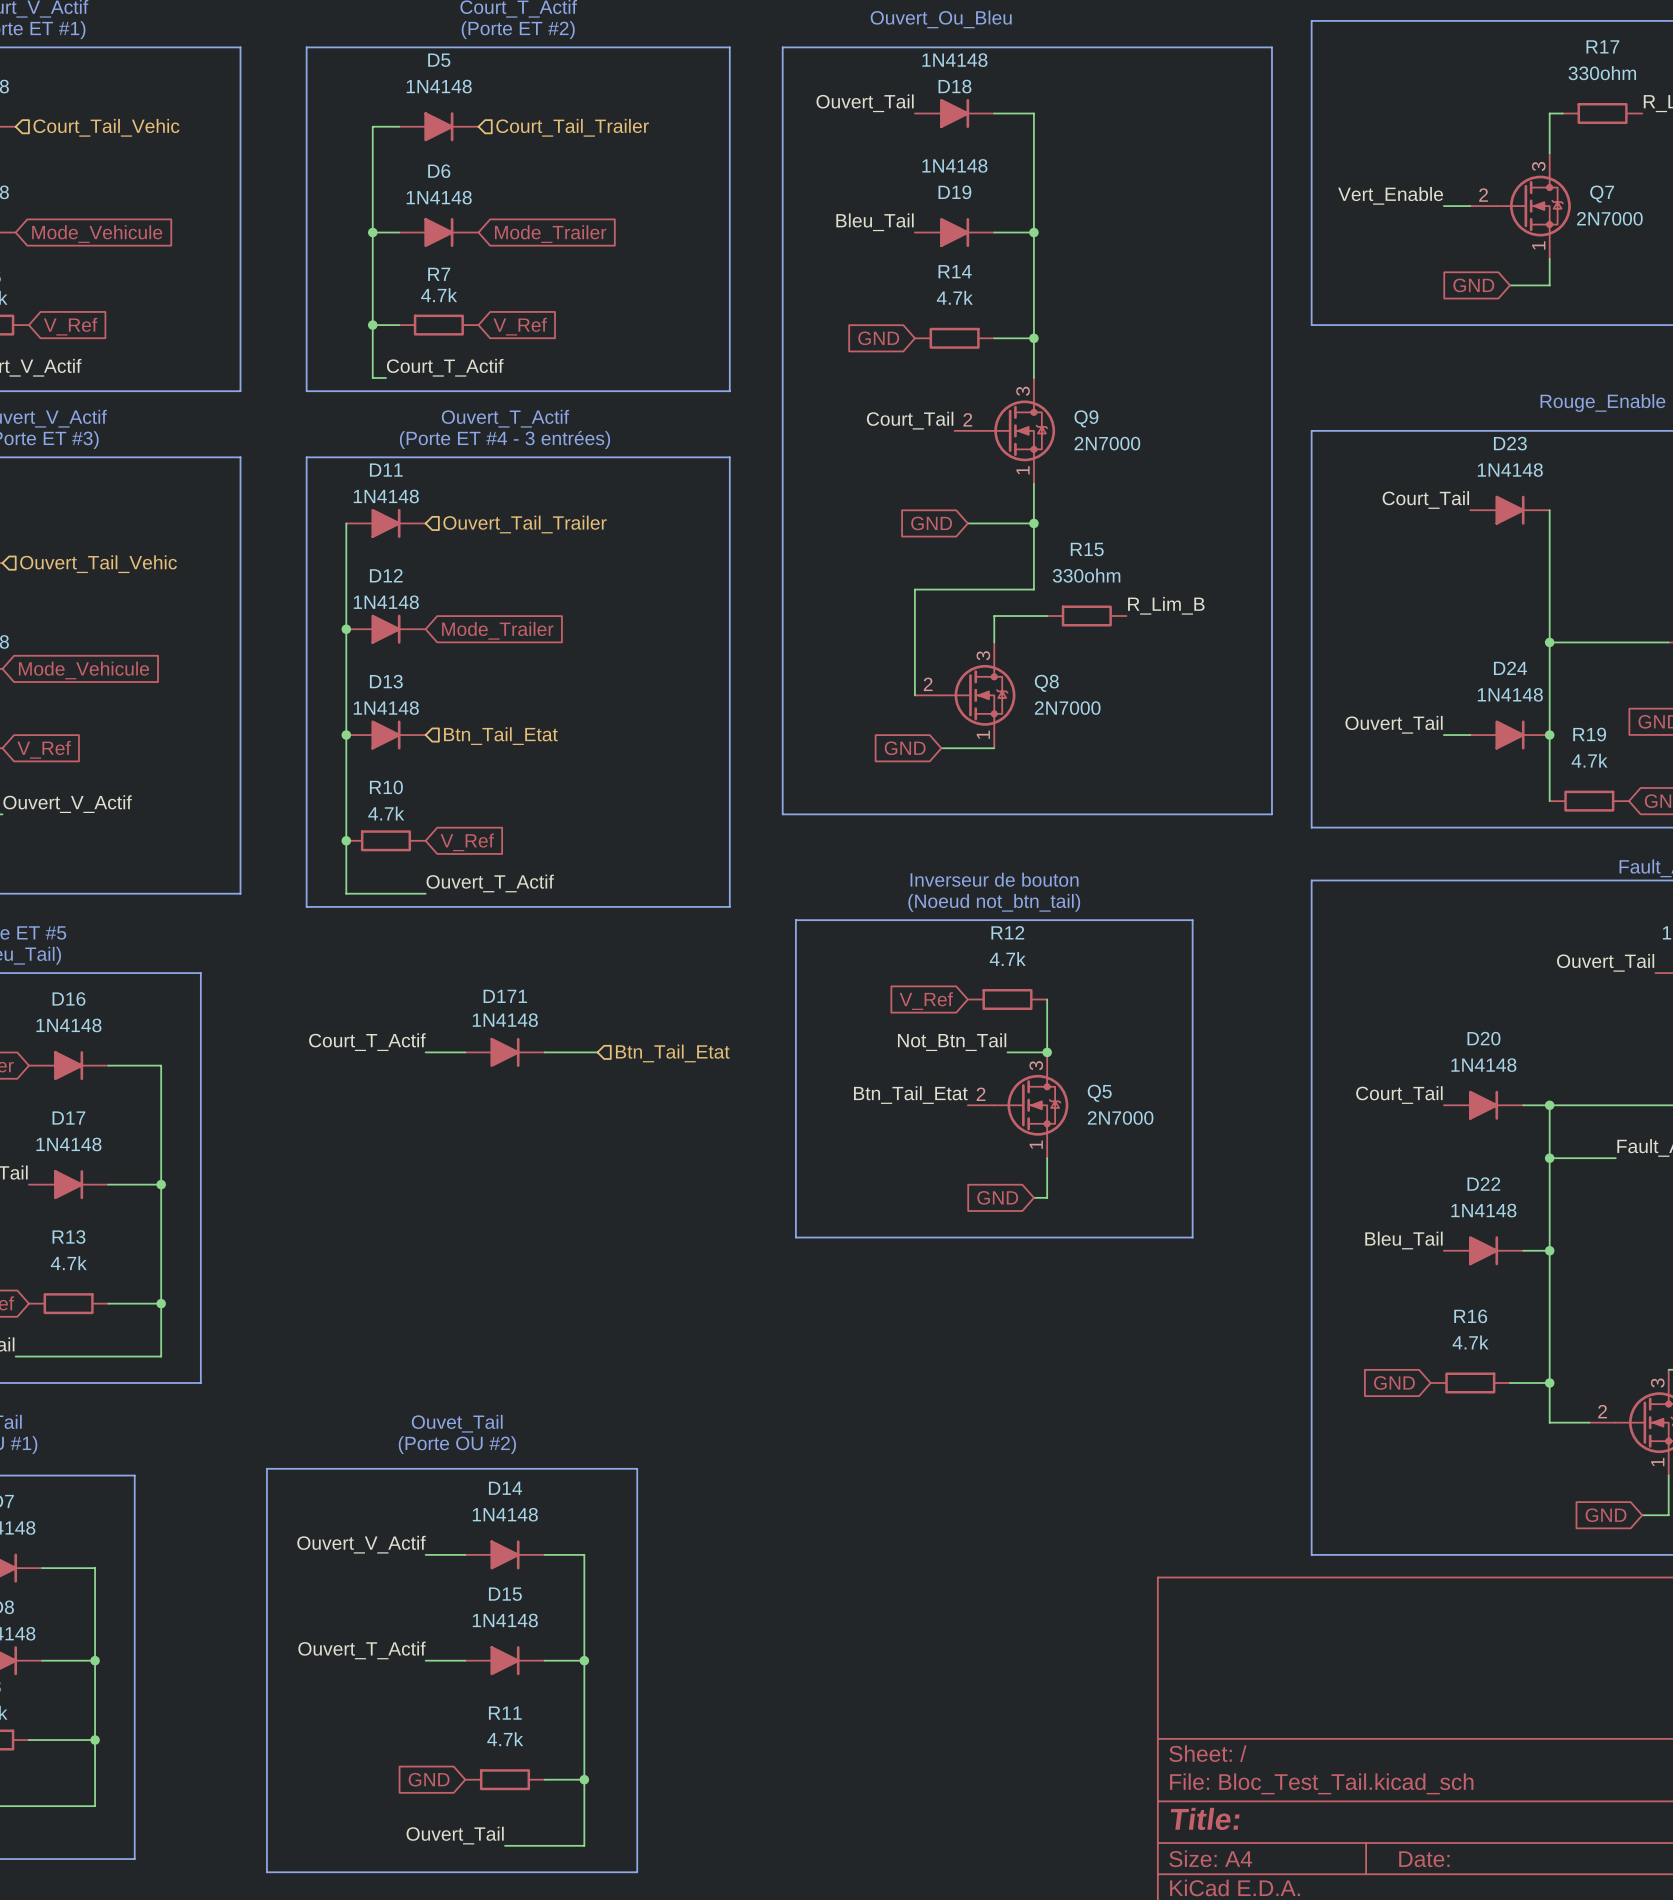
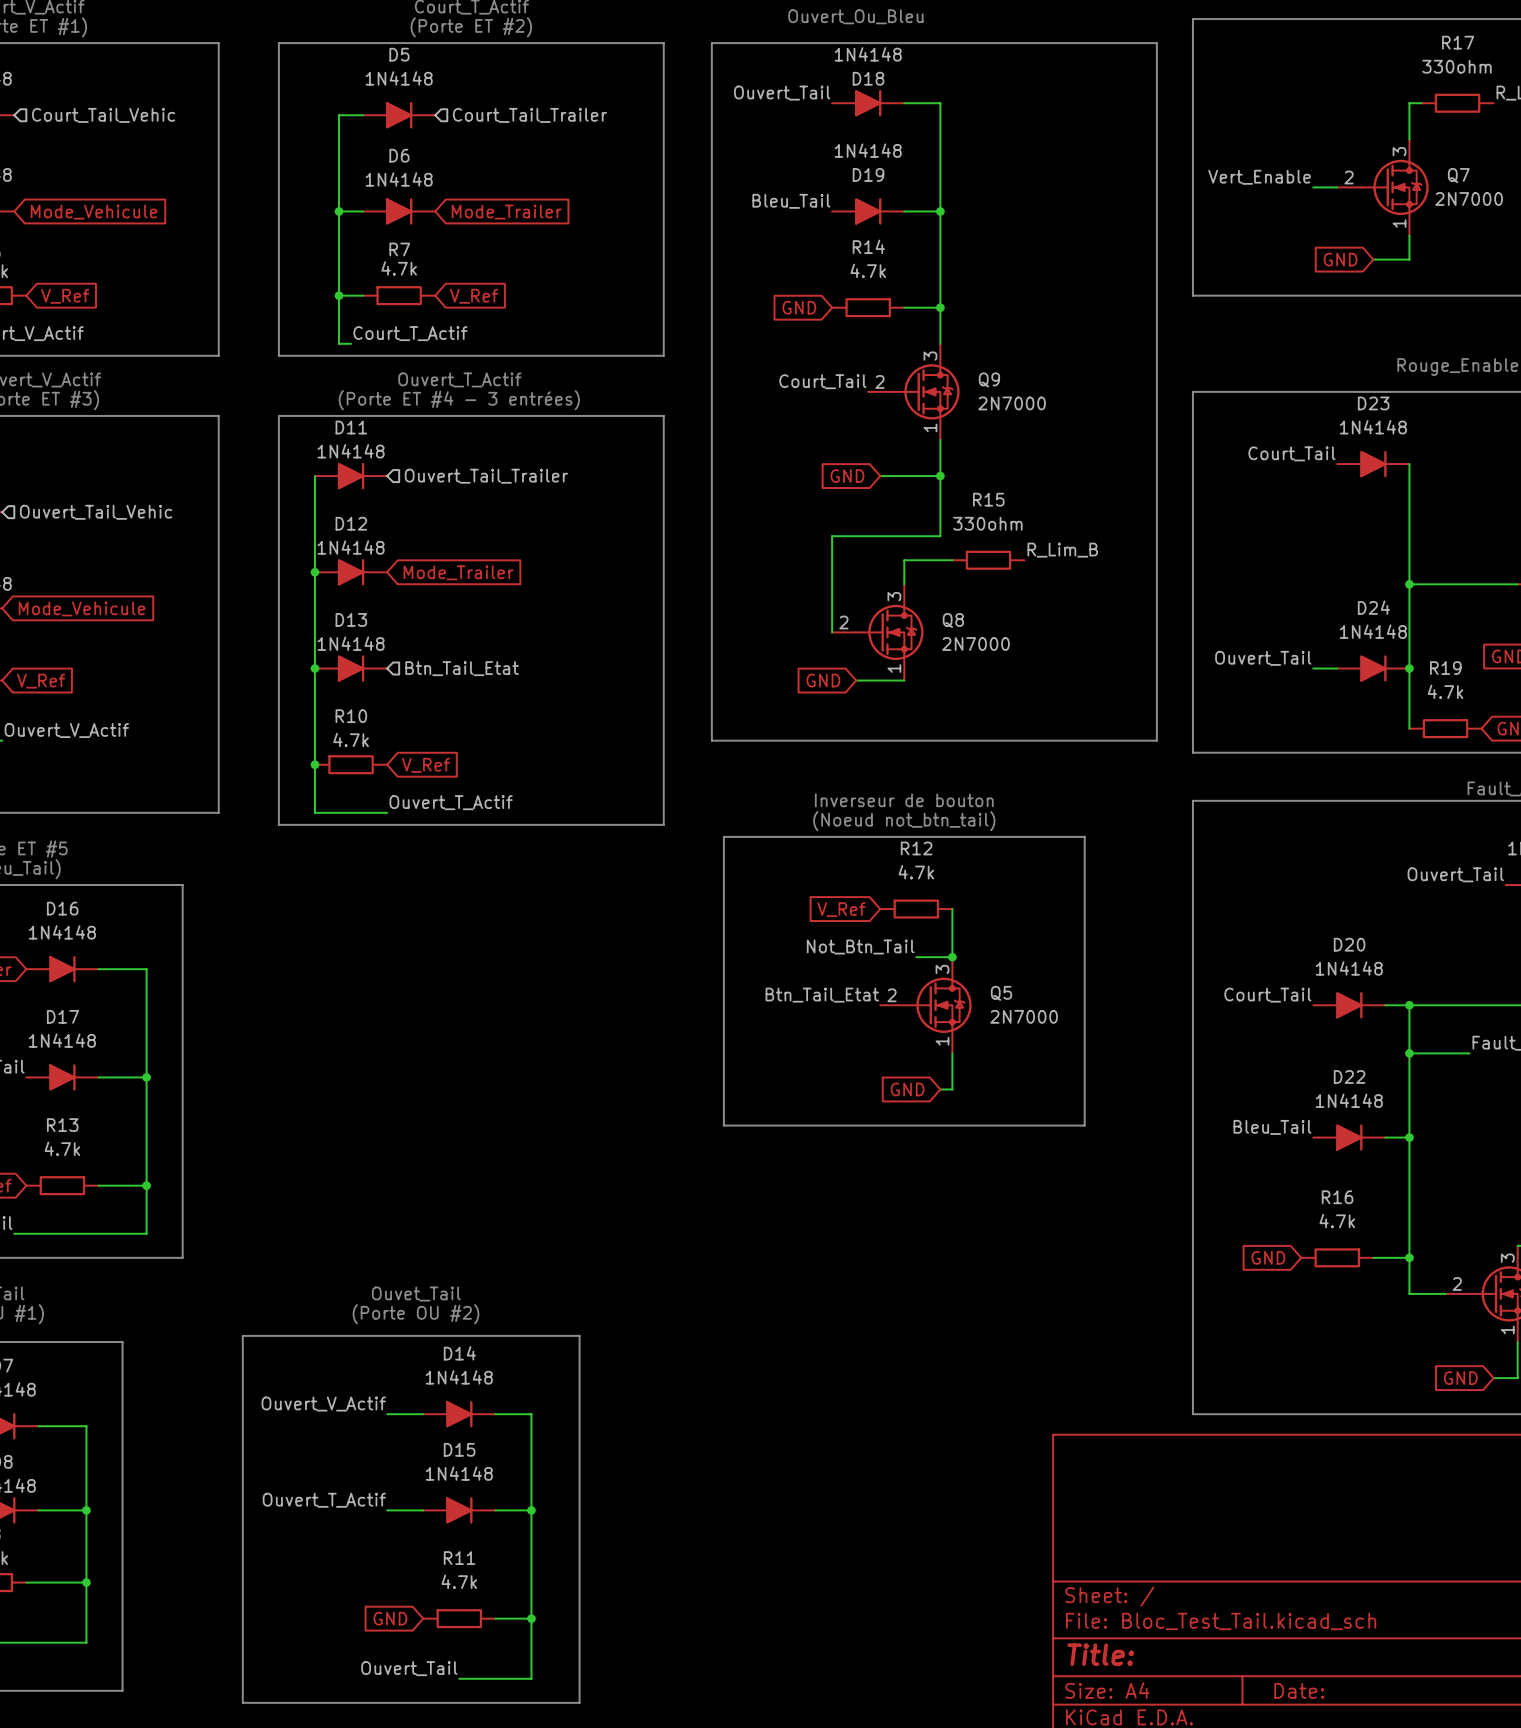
label: Court_T_Actif (367, 1042) -> none
wire: (425, 1052) (465, 1052) -> none
D171: 1N4148 (504, 1052) -> none
wire: (544, 1052) (597, 1052) -> none
hierarchical label: Btn_Tail_Etat (672, 1053) -> none

